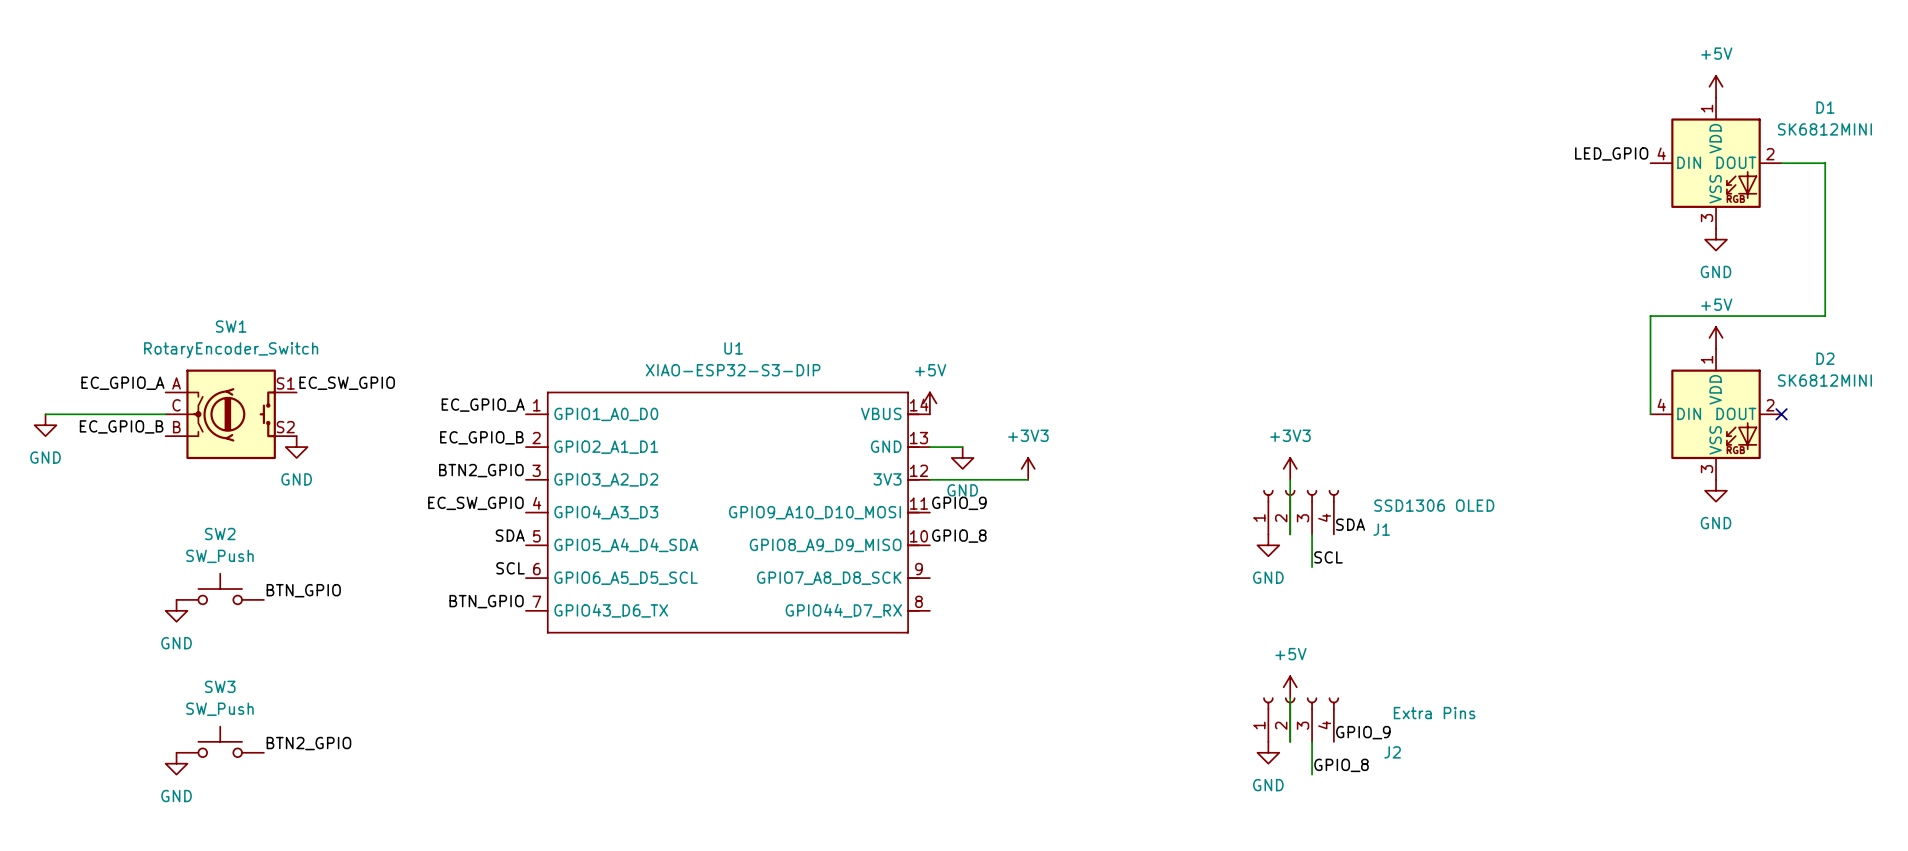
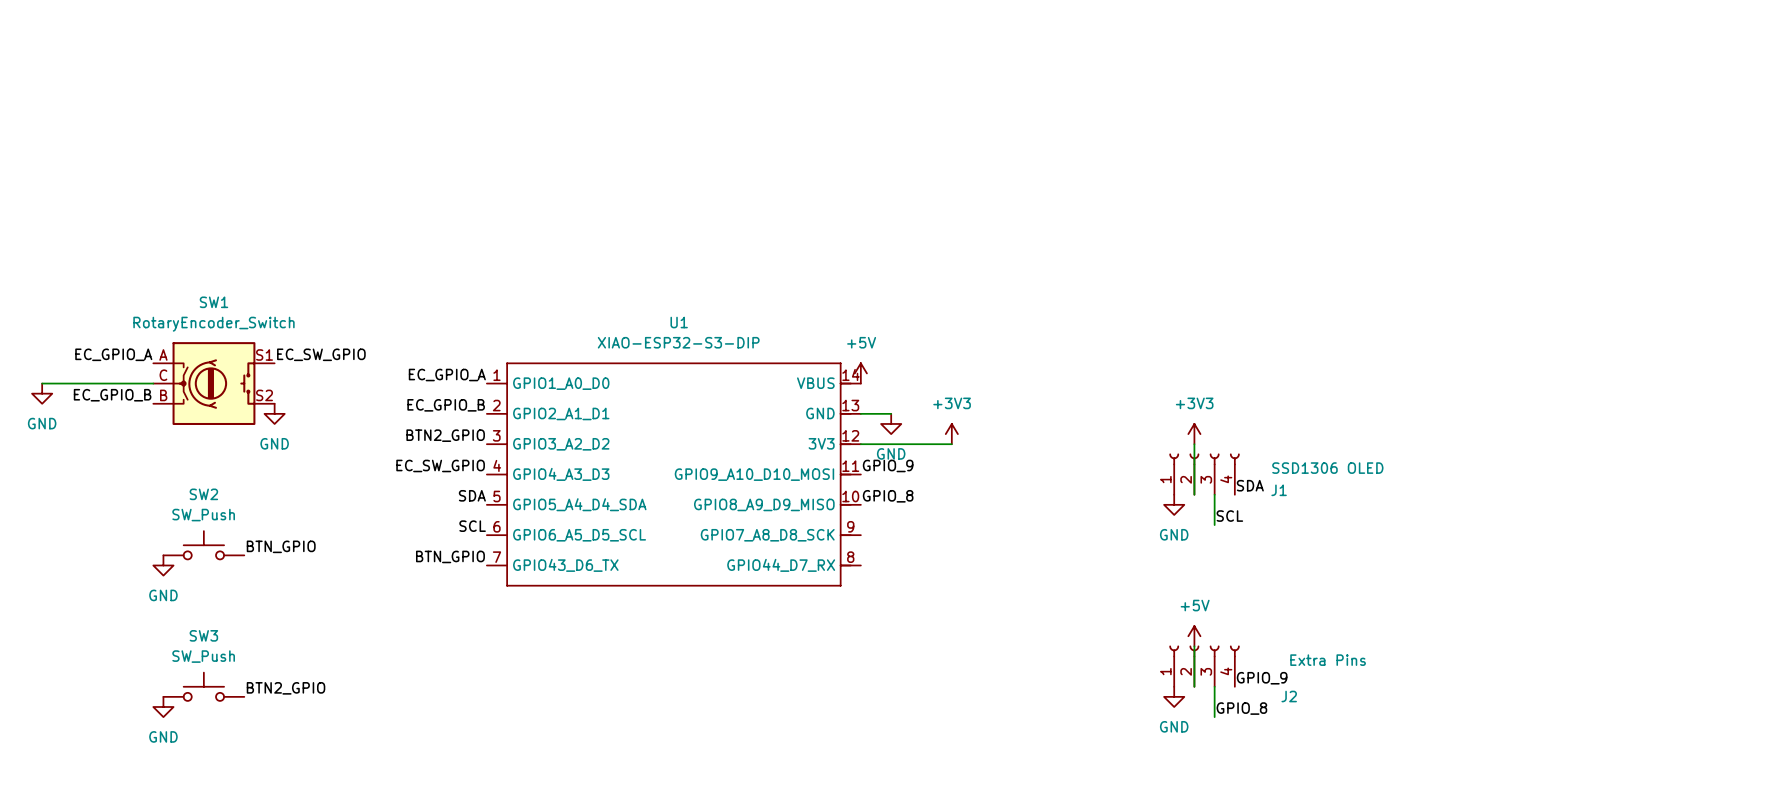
power symbol: +5V (1716, 86) -> none
label: LED_GPIO (1611, 153) -> none
D1: SK6812MINI (1716, 163) -> none
wire: (1781, 163) (1825, 163) (1825, 316) (1650, 316) (1650, 414) -> none
power symbol: GND (1716, 239) -> none
power symbol: +5V (1716, 337) -> none
D2: SK6812MINI (1716, 414) -> none
no-connect mark: (1781, 414) -> none
power symbol: GND (1716, 490) -> none

